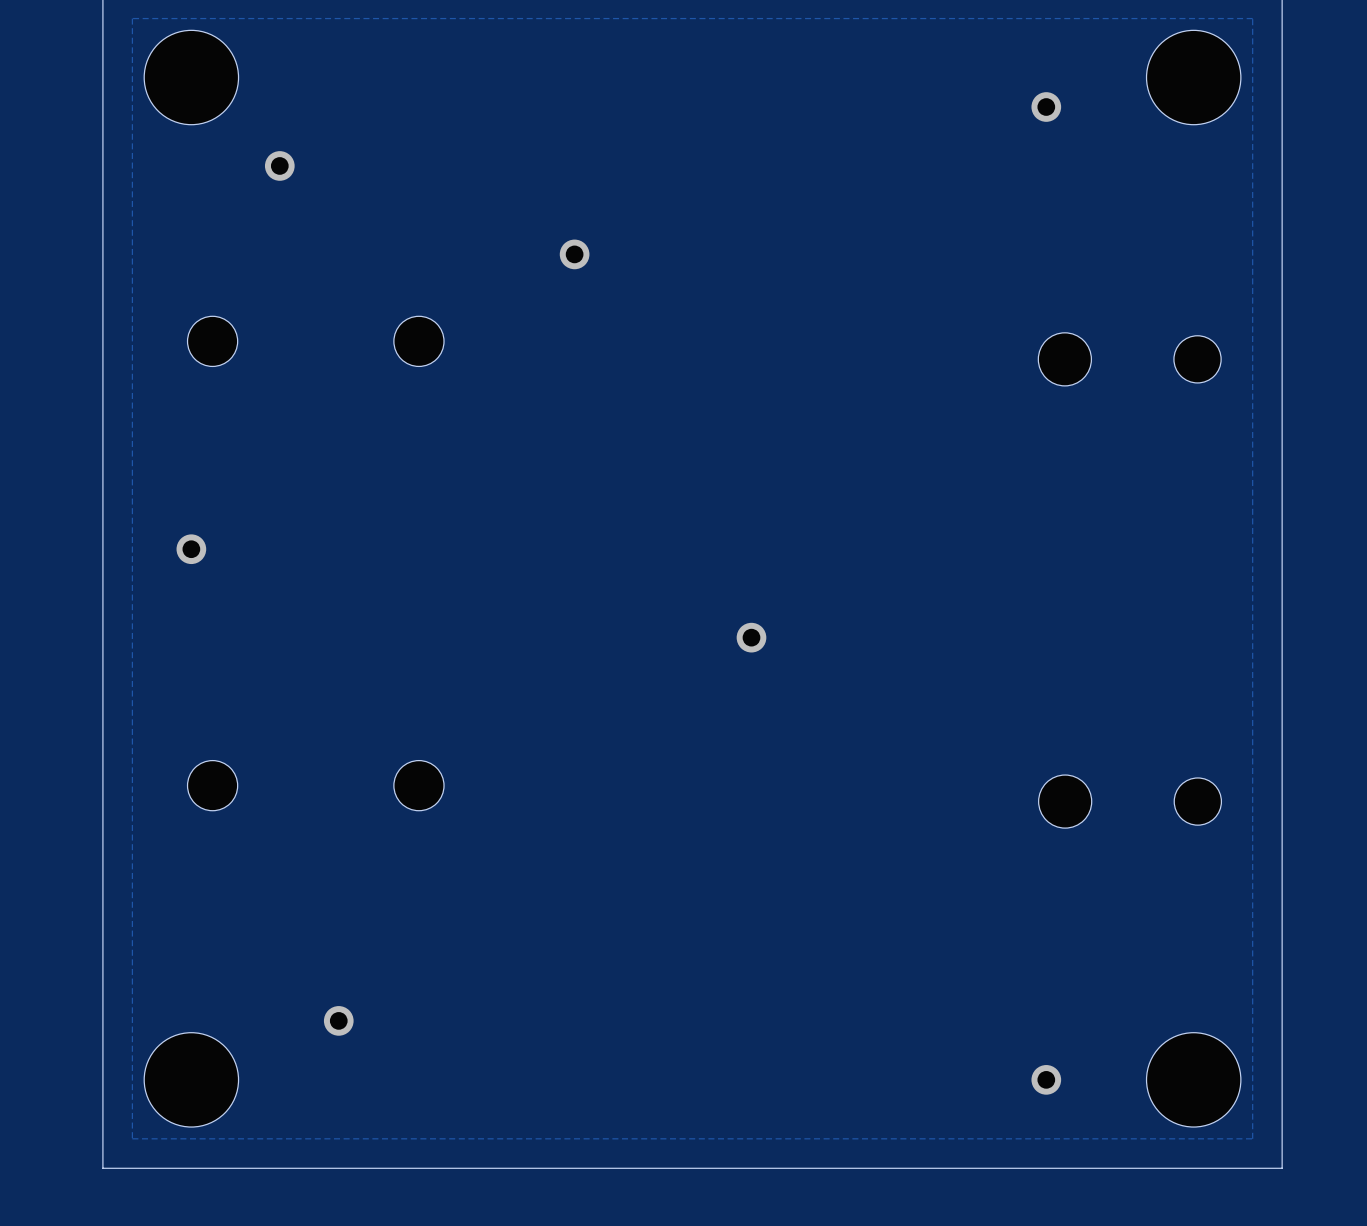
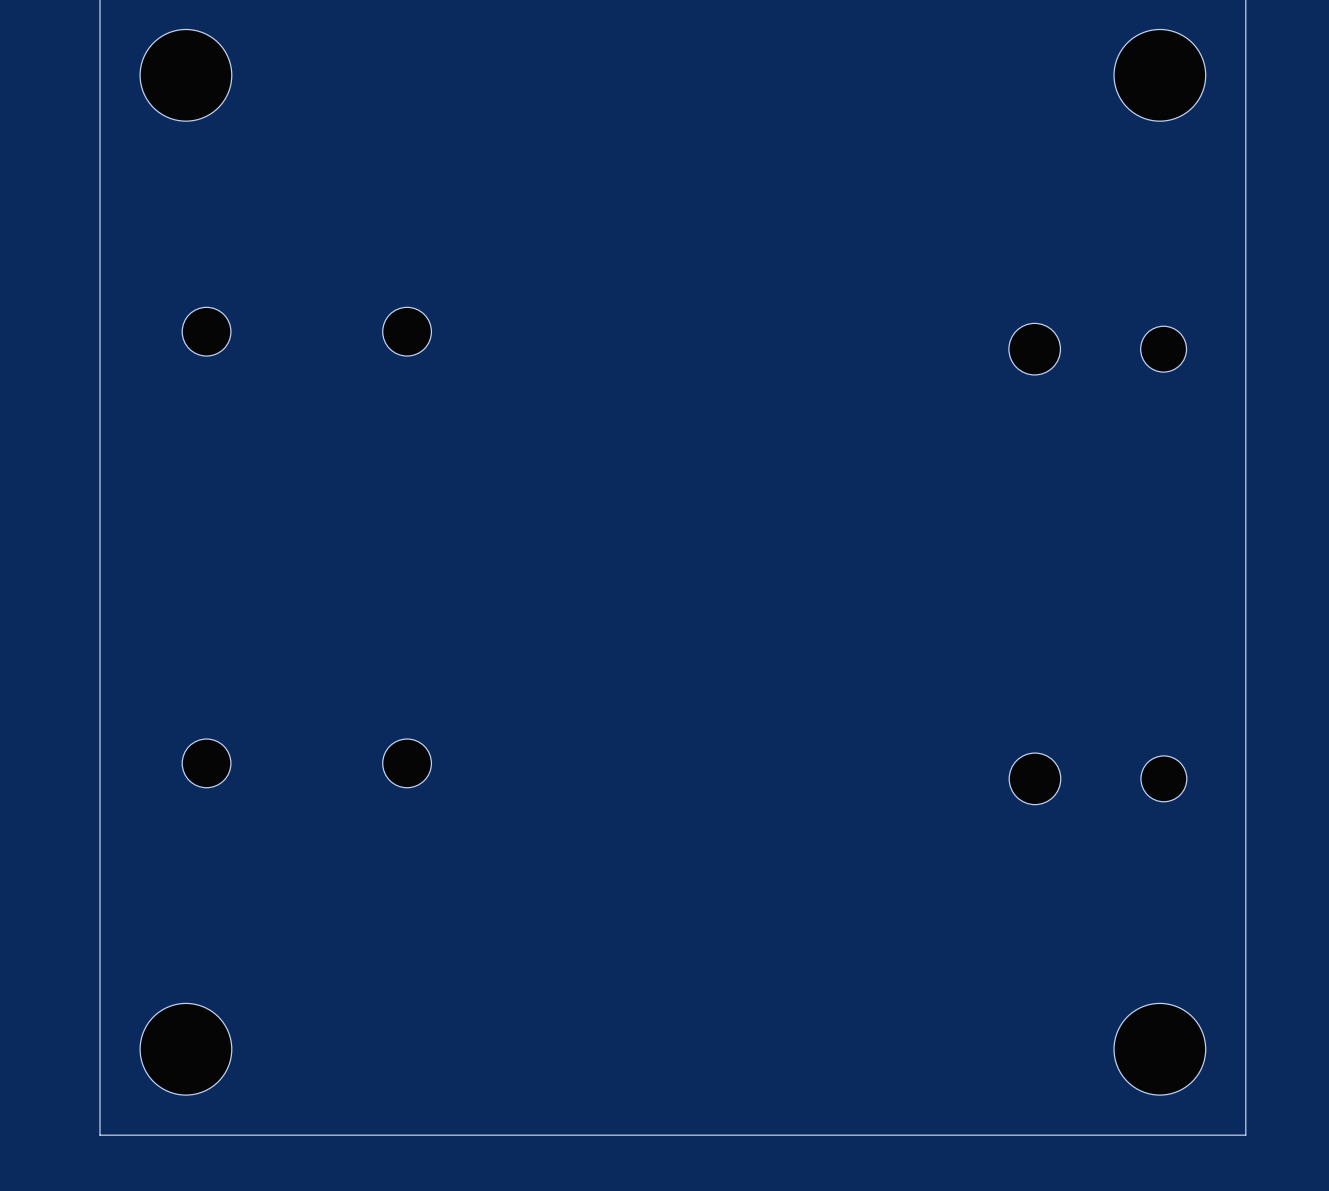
zone outline: (1252, 18) (132, 18) (132, 1138) (1252, 1138) (1252, 18) -> none
via: (1046, 107) -> none
via: (279, 165) -> none
via: (574, 254) -> none
via: (191, 549) -> none
via: (751, 637) -> none
via: (338, 1020) -> none
via: (1046, 1079) -> none

